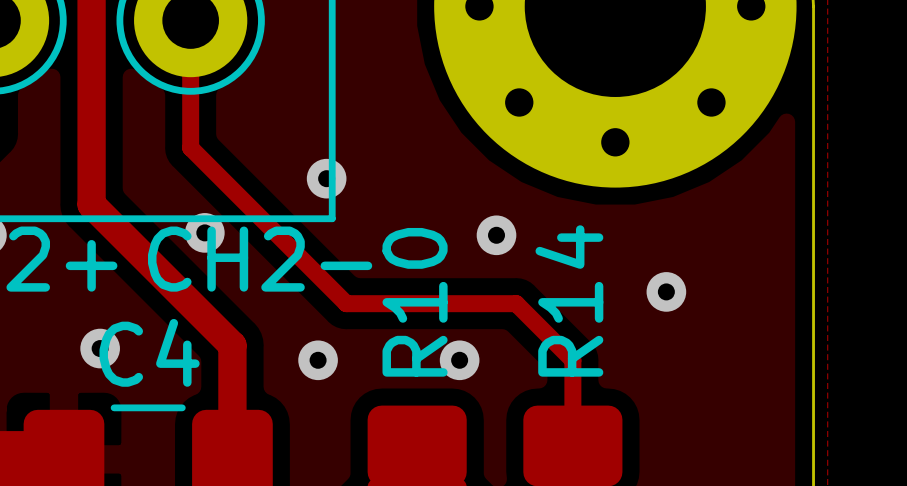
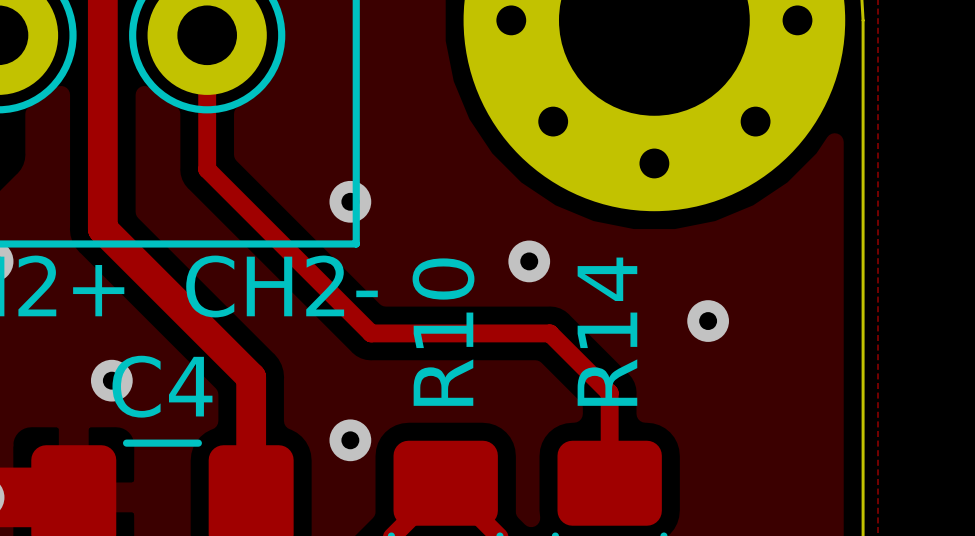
via: (204, 232) -> none
via position: (318, 360) -> (350, 440)
via: (459, 360) -> none

